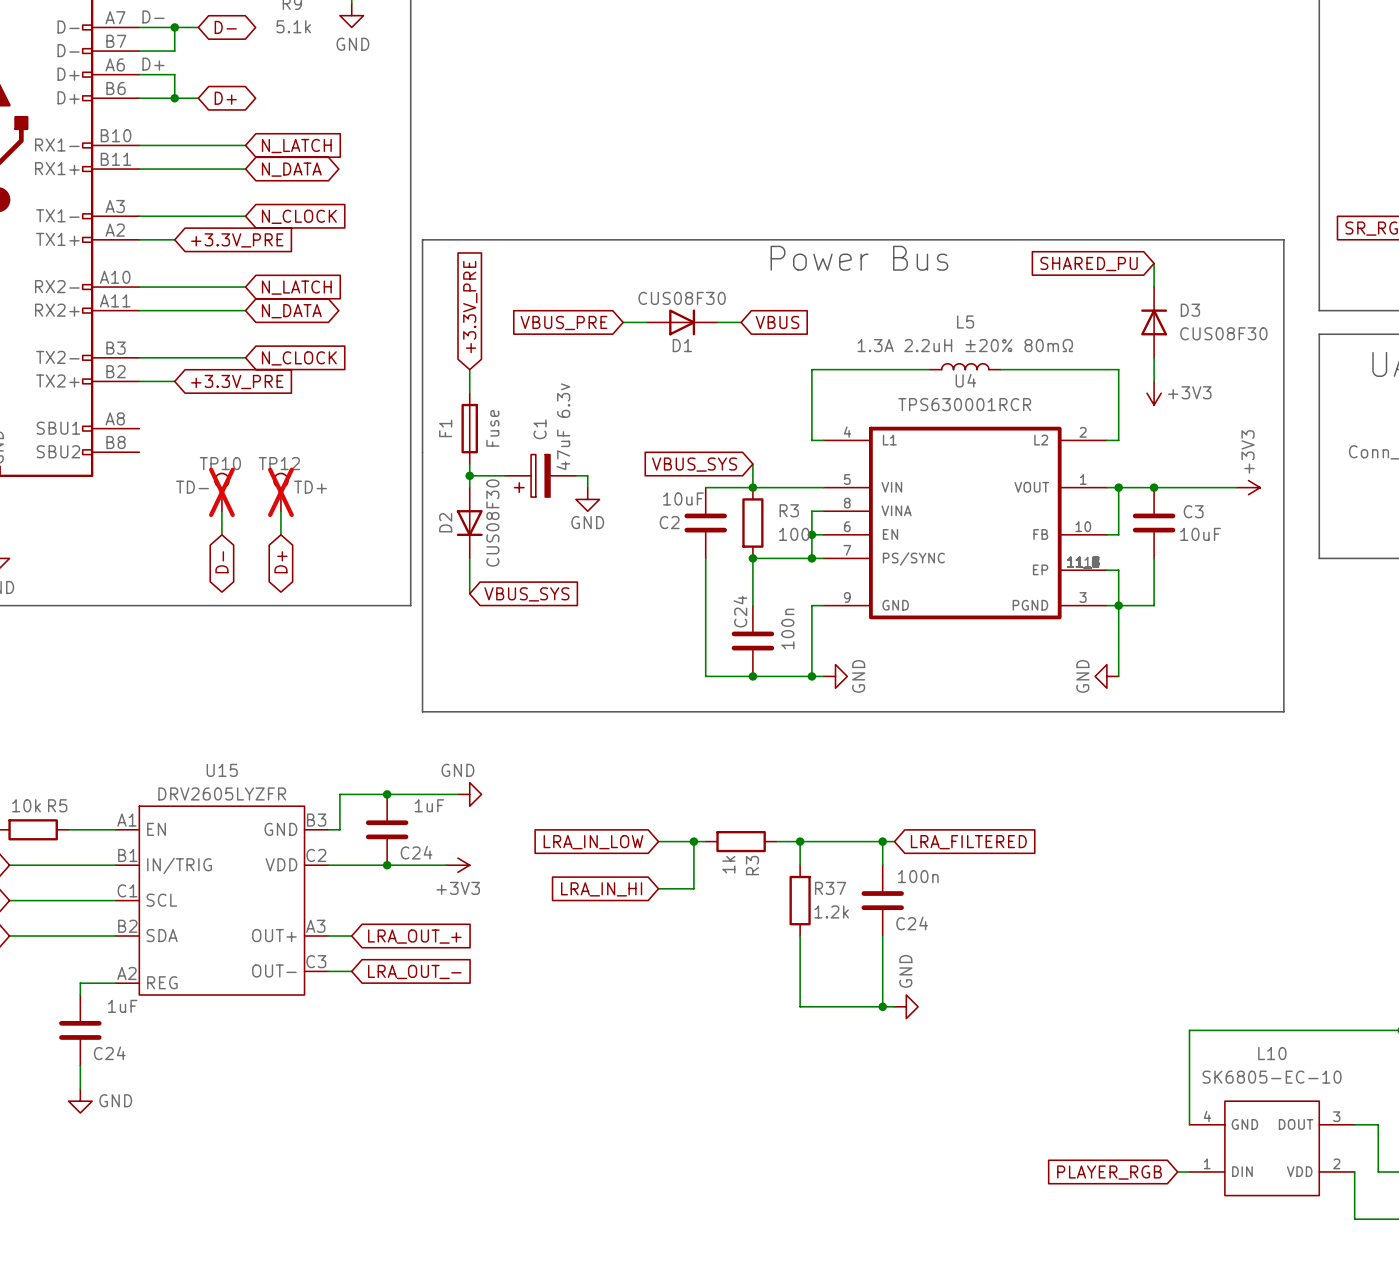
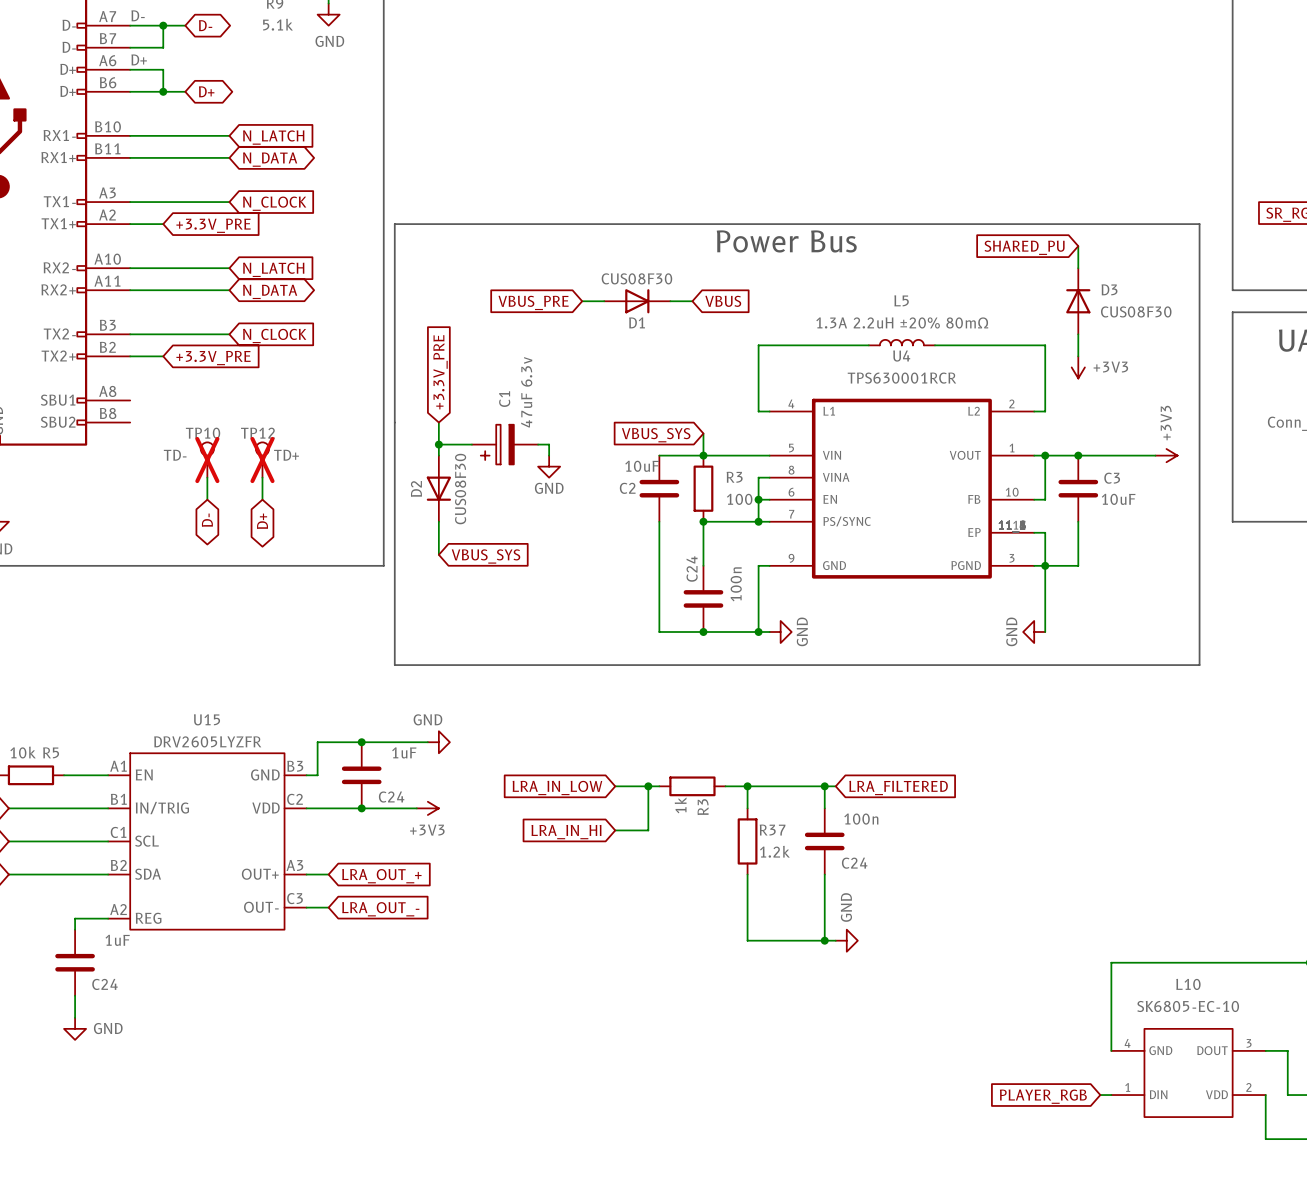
global label position: +3.3V_PRE (470, 307) -> +3.3V_PRE (440, 372)
wire: (469, 369) (469, 393) -> none
F1: Fuse (469, 428) -> none

